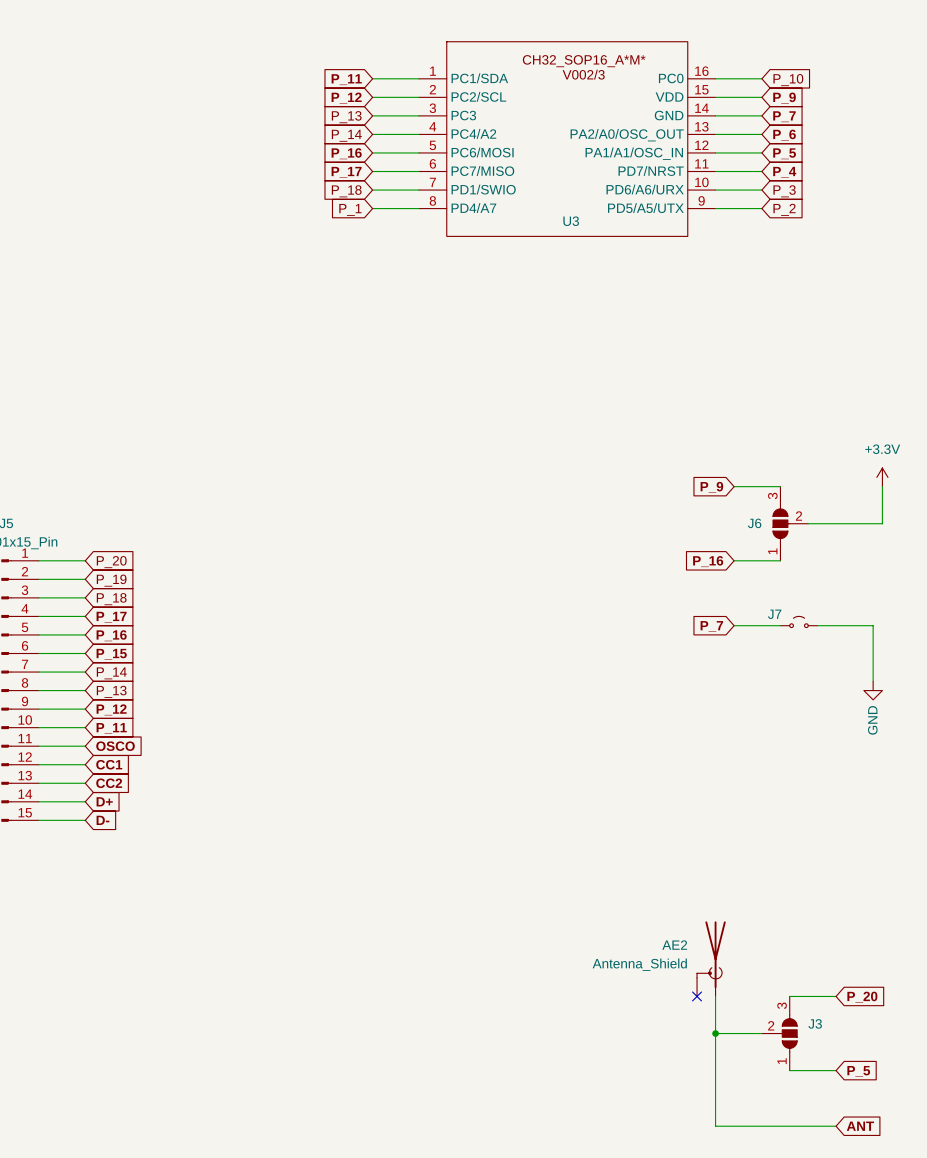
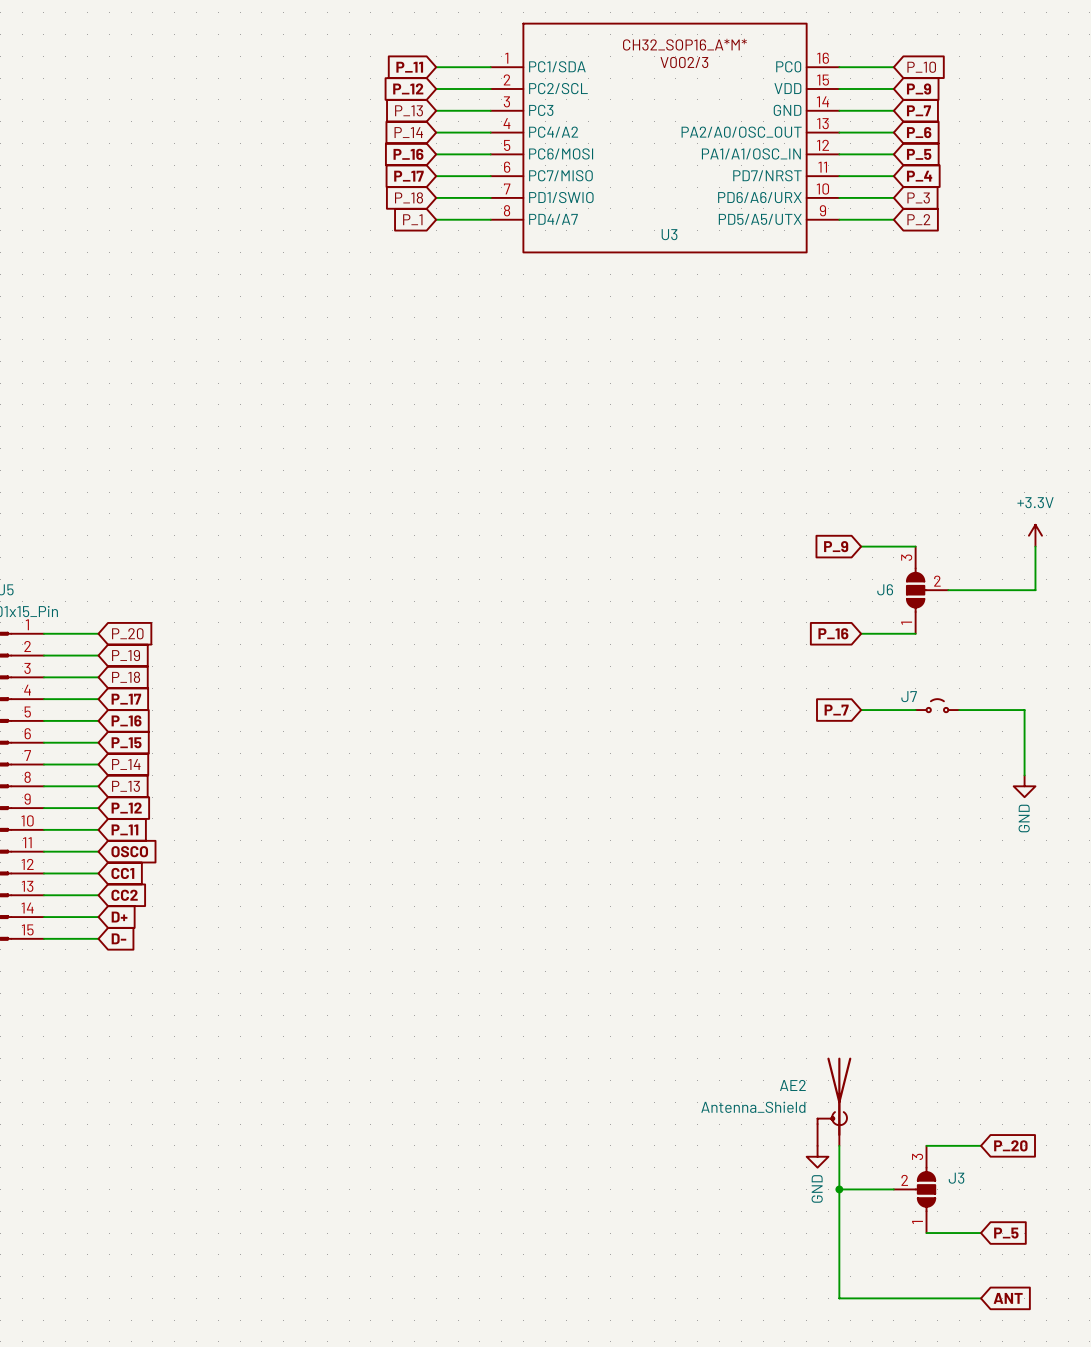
no-connect mark: (697, 996) -> none
power symbol: none -> GND (817, 1156)

